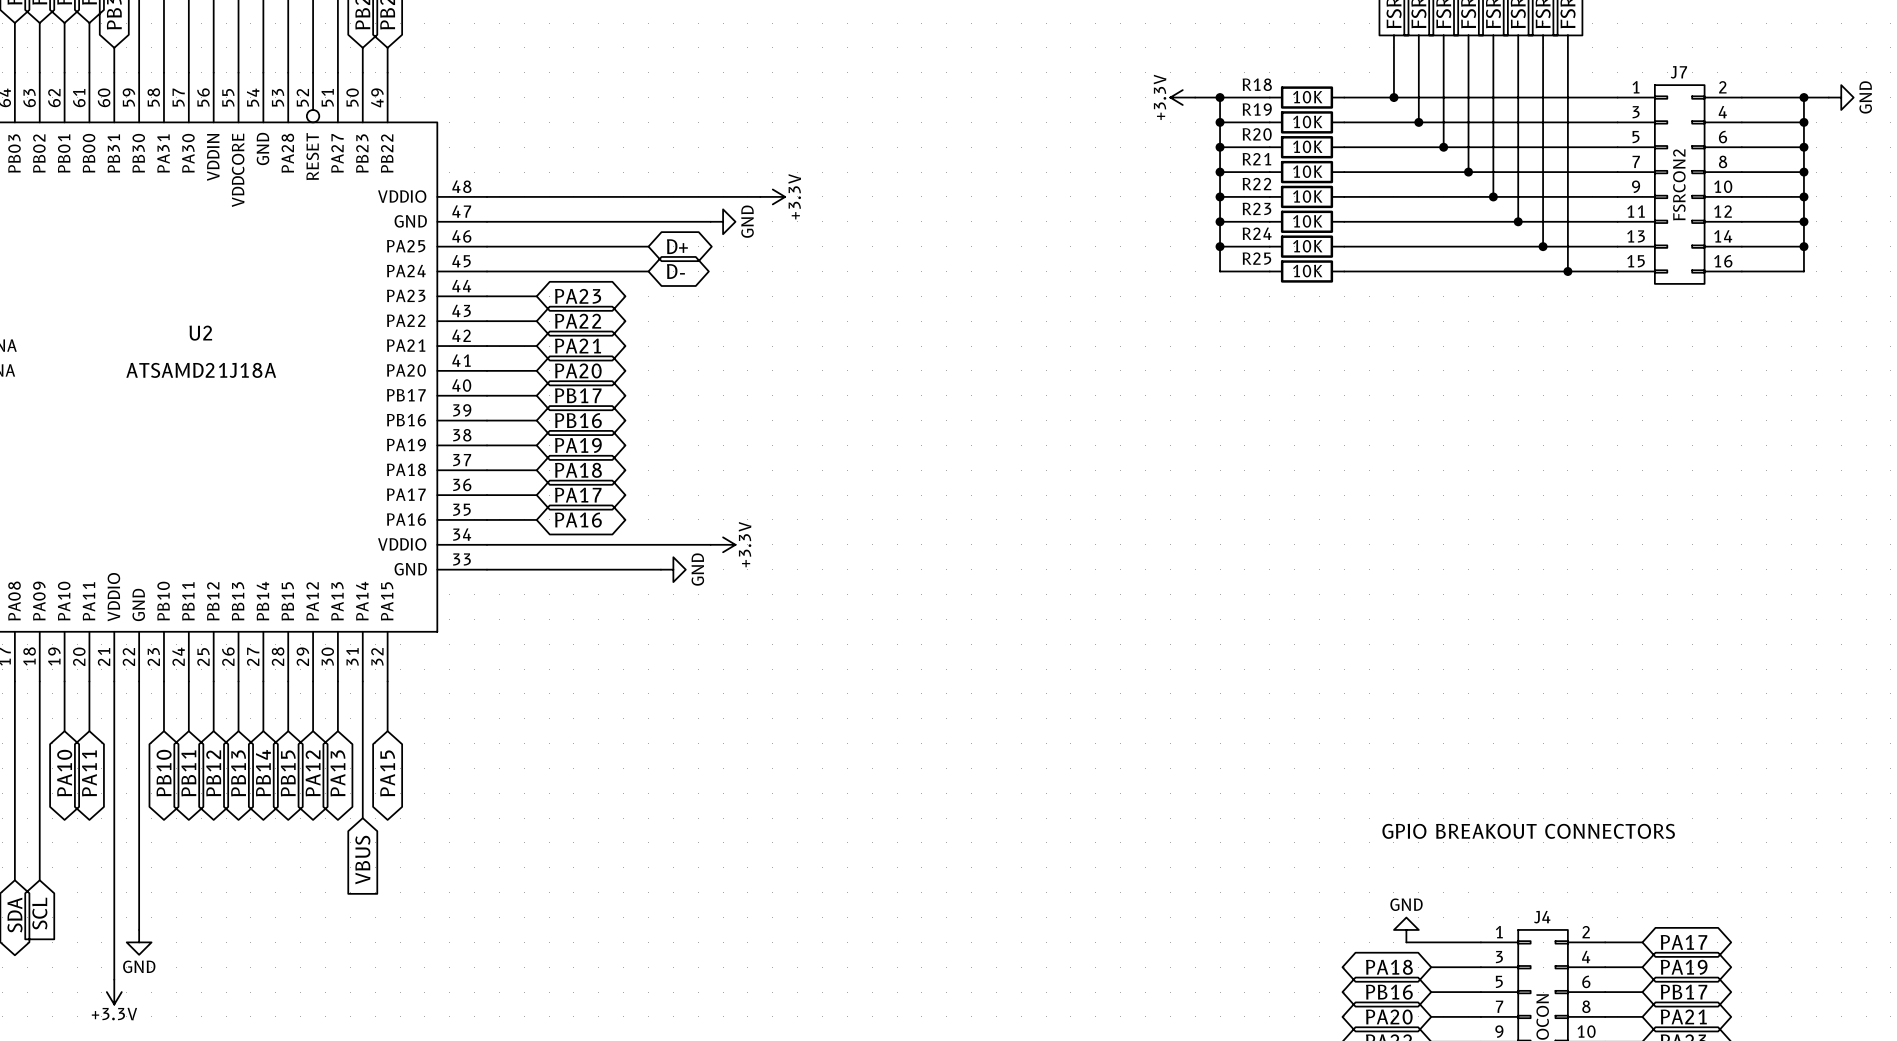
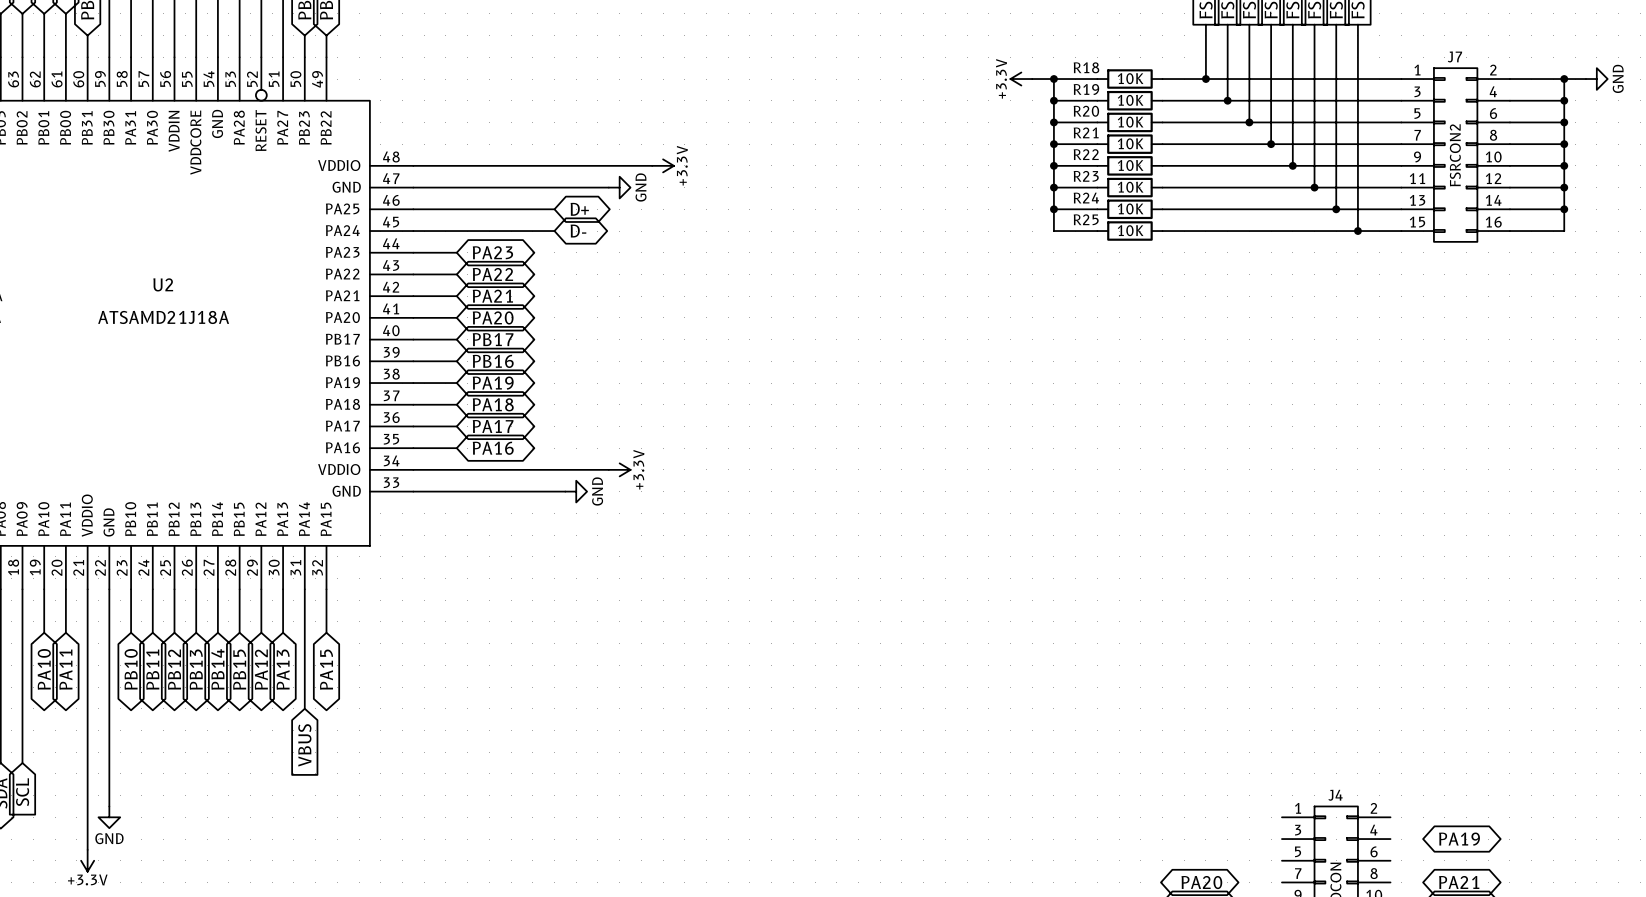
text: GPIO BREAKOUT CONNECTORS (1528, 831) -> none
power symbol: GND (1406, 929) -> none
wire: (1406, 942) (1480, 942) -> none
wire: (1605, 942) (1642, 942) -> none
global label: PA17 (1684, 942) -> none
global label: PA18 (1389, 967) -> none
wire: (1431, 967) (1480, 967) -> none
wire: (1605, 967) (1642, 967) -> none
global label: PB16 (1389, 992) -> none
wire: (1431, 992) (1480, 992) -> none
wire: (1605, 992) (1642, 992) -> none
global label: PB17 (1684, 992) -> none
wire: (1431, 1016) (1480, 1016) -> none
wire: (1605, 1016) (1642, 1016) -> none

